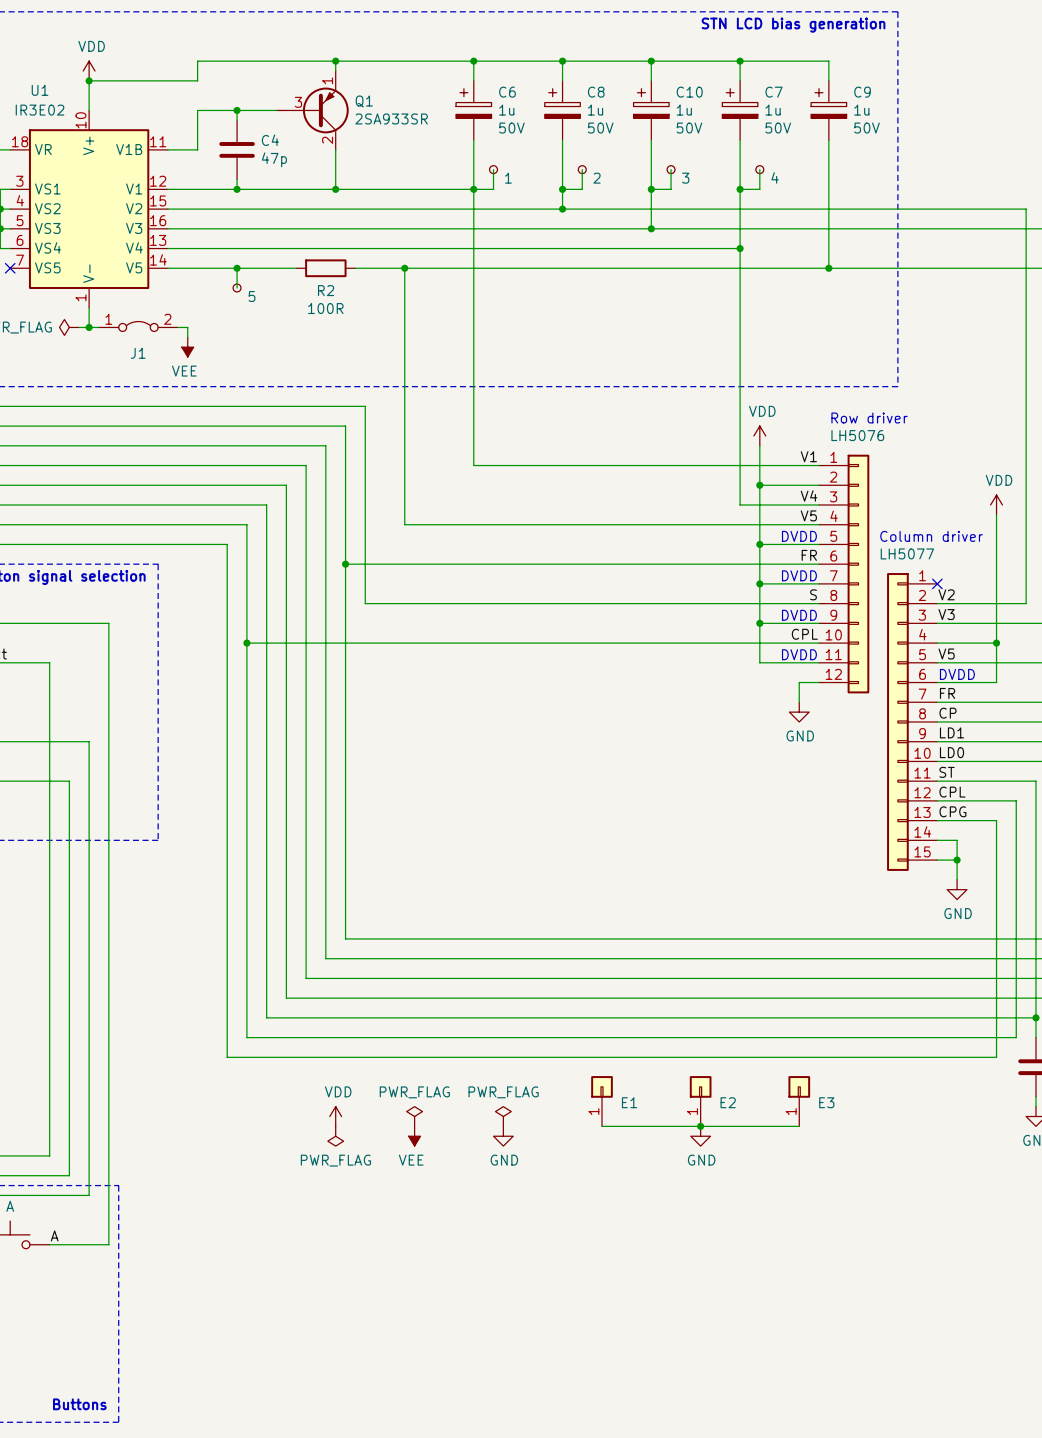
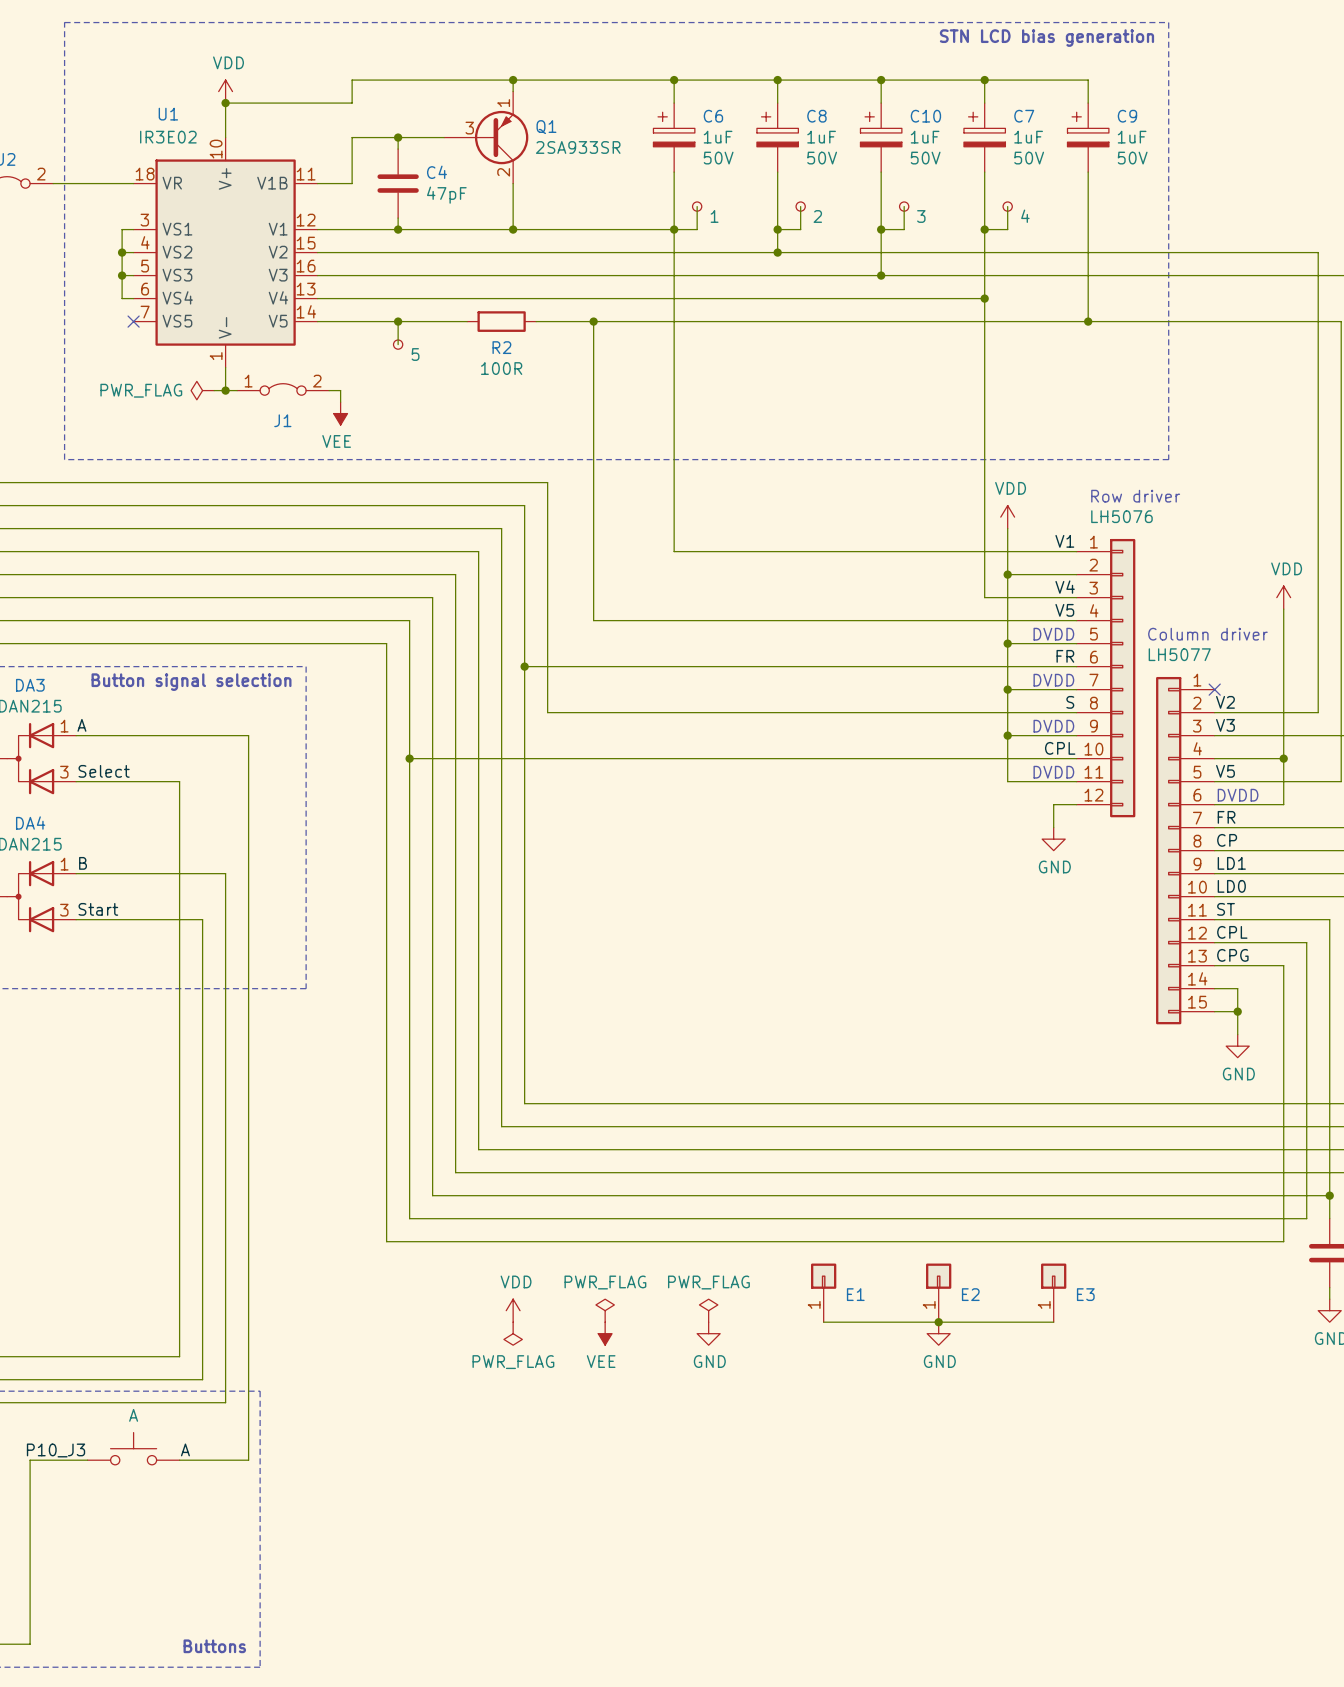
C6 value: 1u (506, 110) -> 1uF (718, 137)
C8 value: 1u (595, 110) -> 1uF (821, 137)
C10 value: 1u (684, 110) -> 1uF (925, 137)
C7 value: 1u (773, 110) -> 1uF (1028, 137)
C9 value: 1u (861, 110) -> 1uF (1132, 137)
C4 value: 47p (274, 159) -> 47pF (446, 195)

